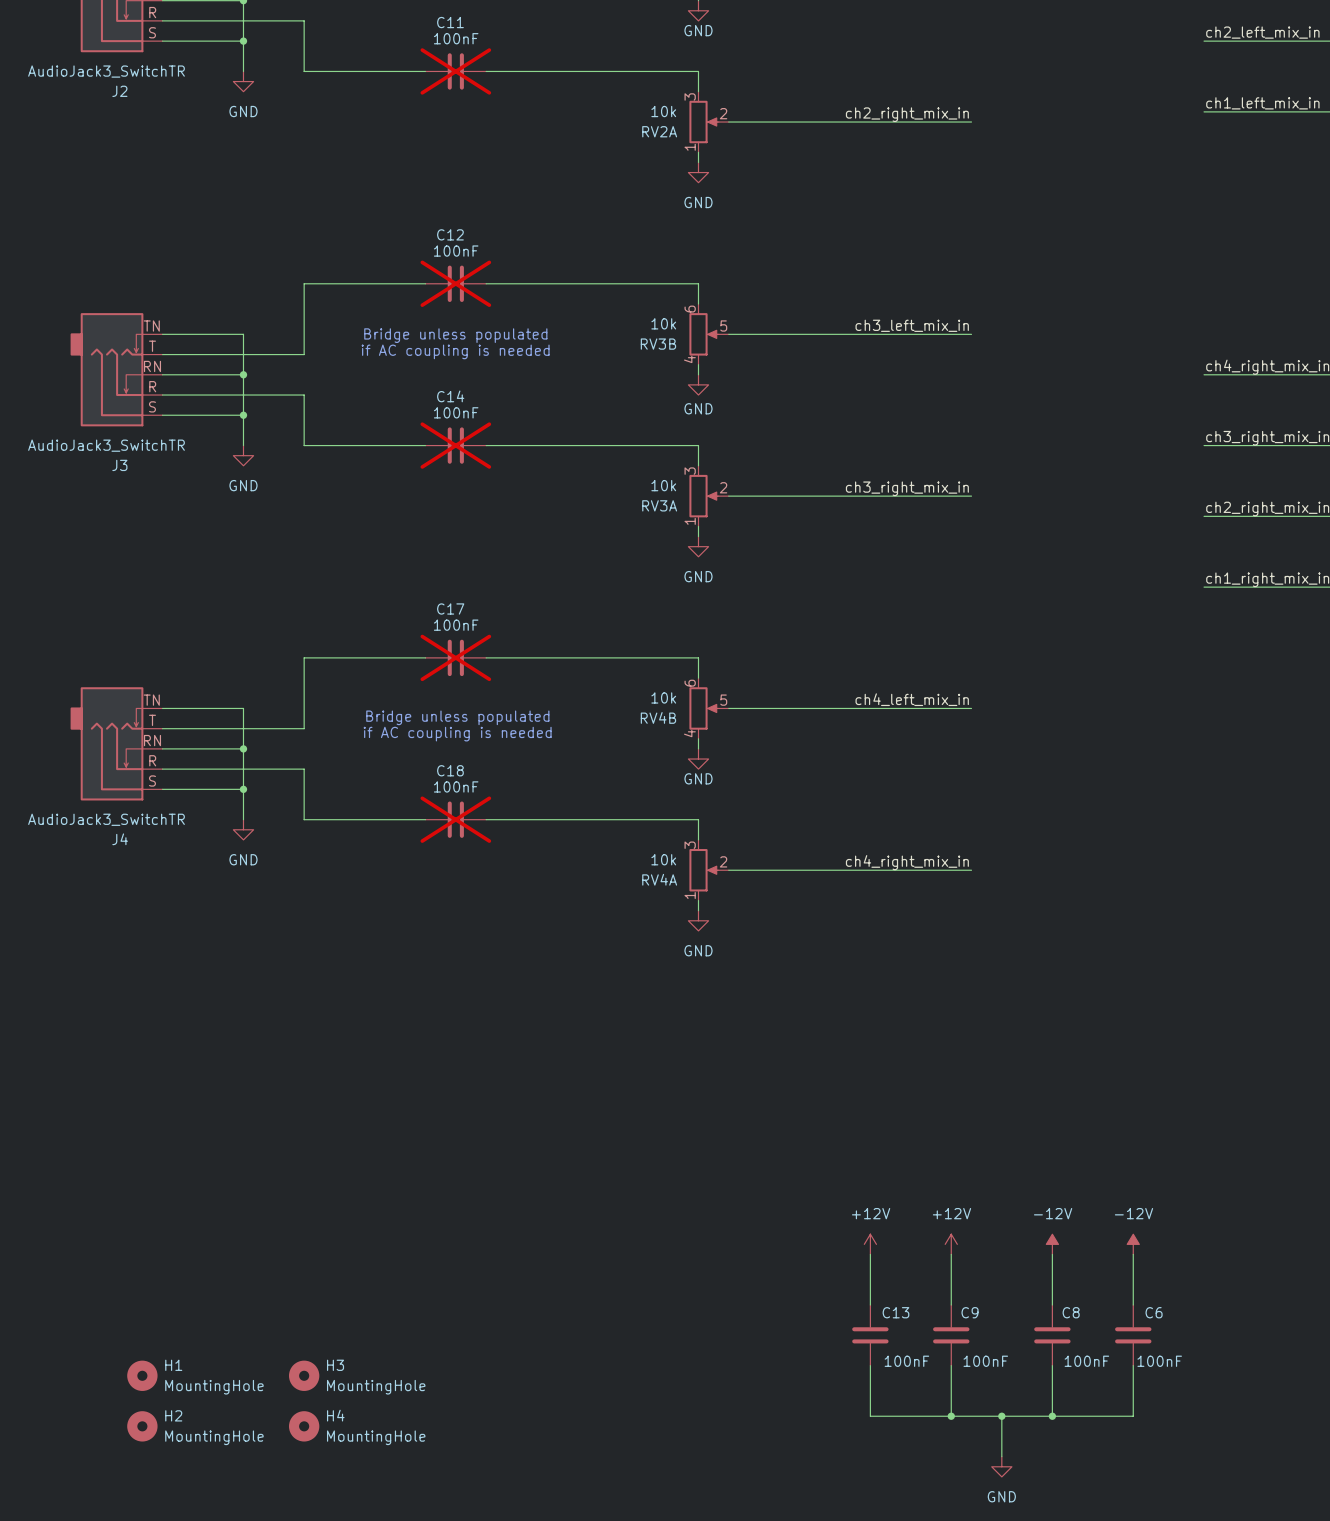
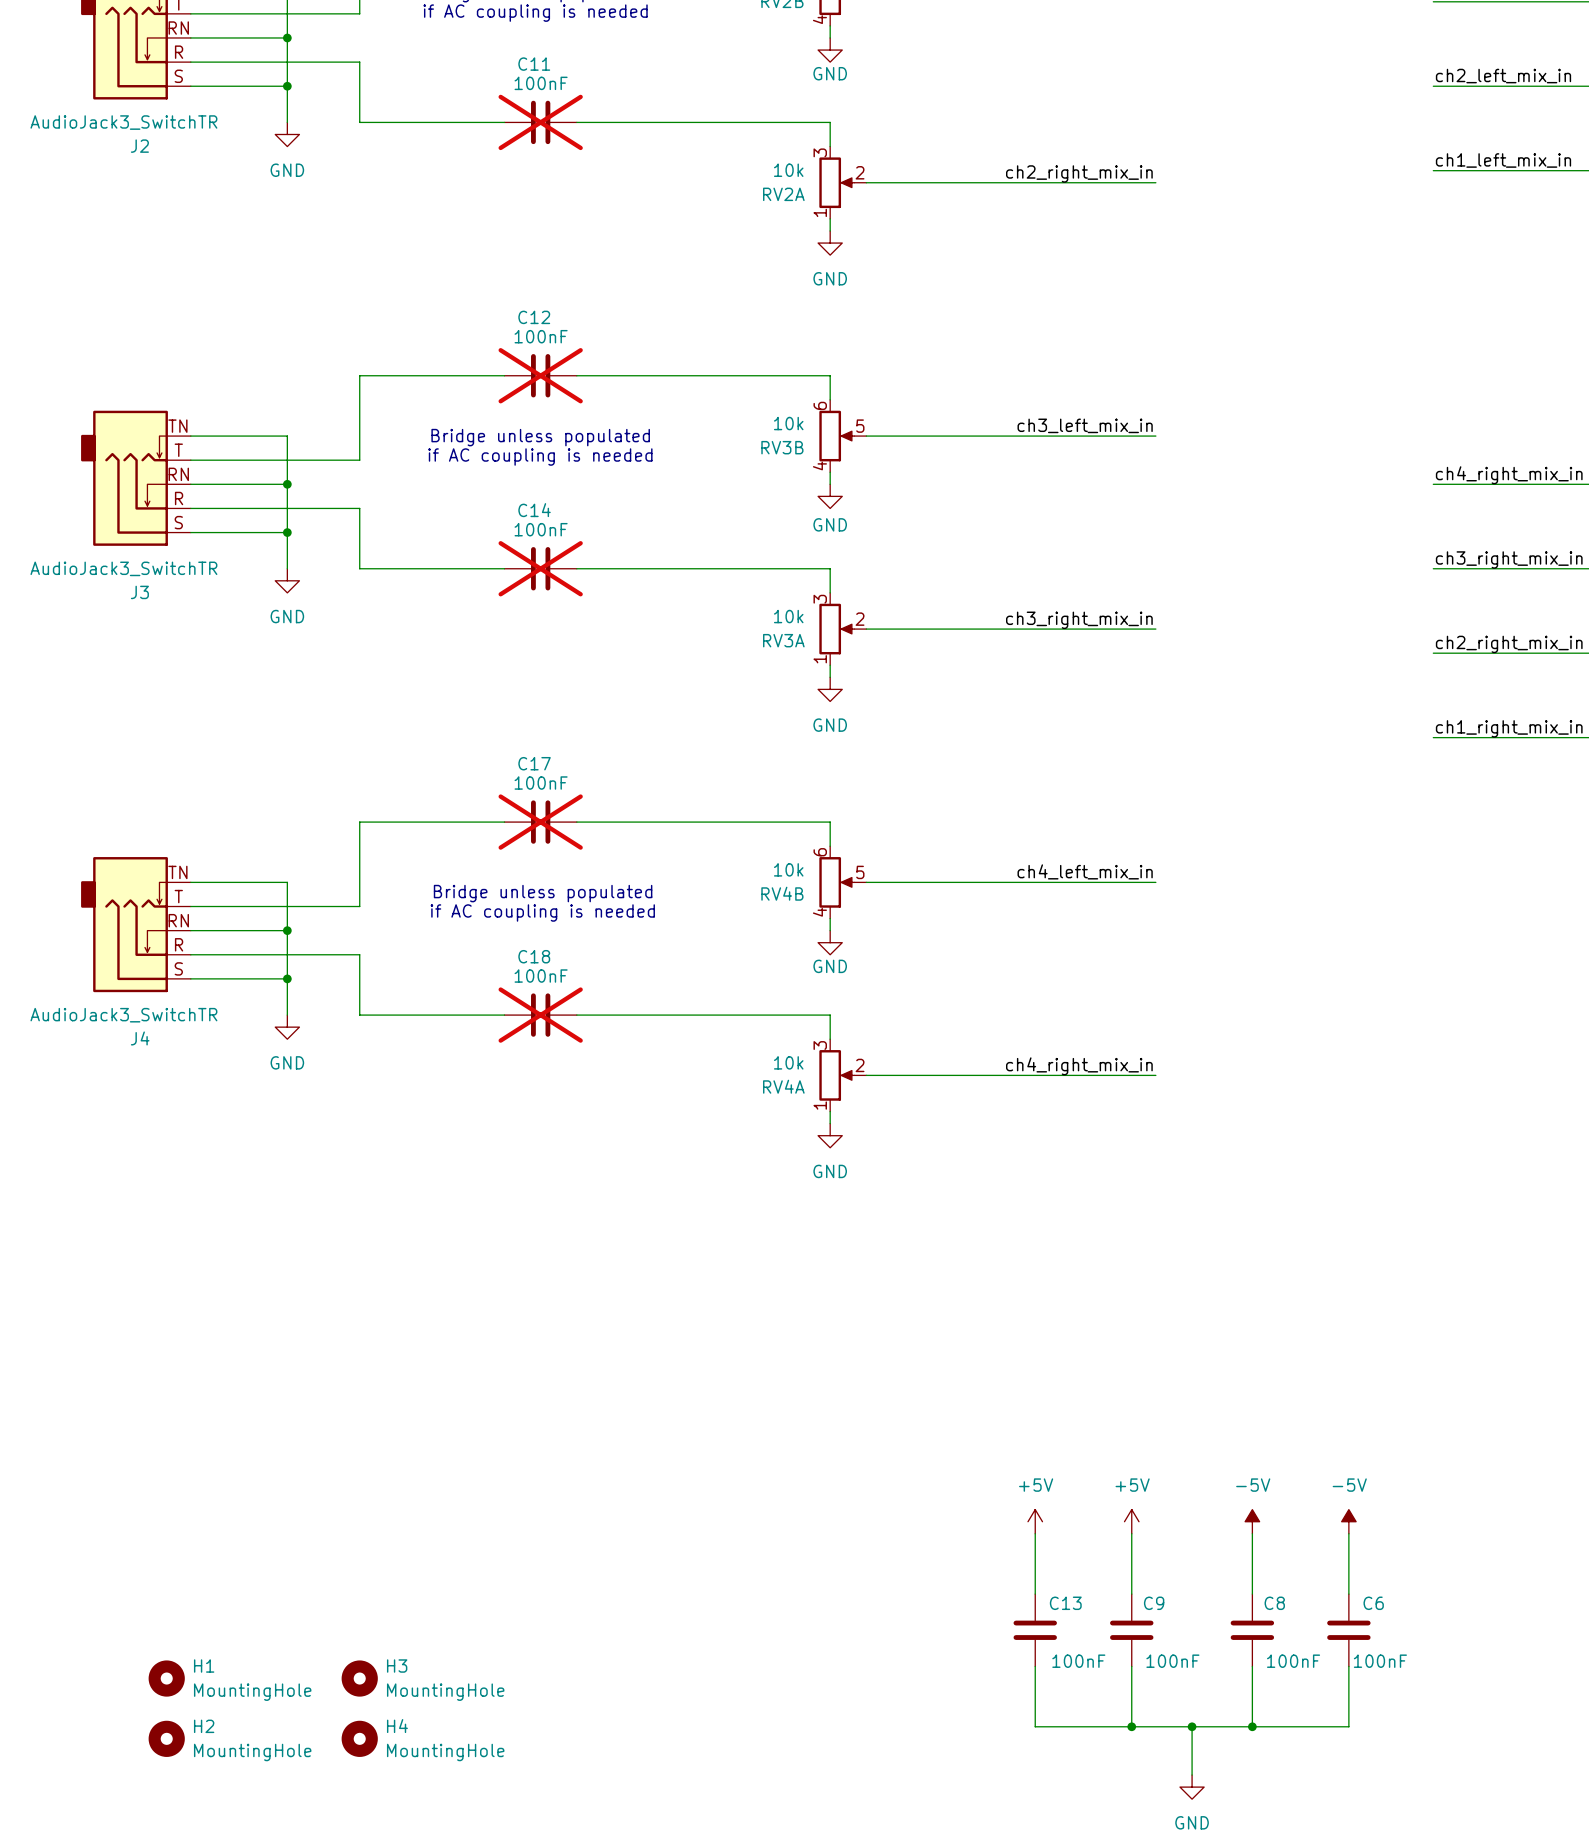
power symbol: +12V (870, 1244) -> +5V (1035, 1521)
power symbol: +12V (951, 1244) -> +5V (1131, 1521)
power symbol: -12V (1052, 1244) -> -5V (1252, 1521)
power symbol: -12V (1133, 1244) -> -5V (1348, 1521)

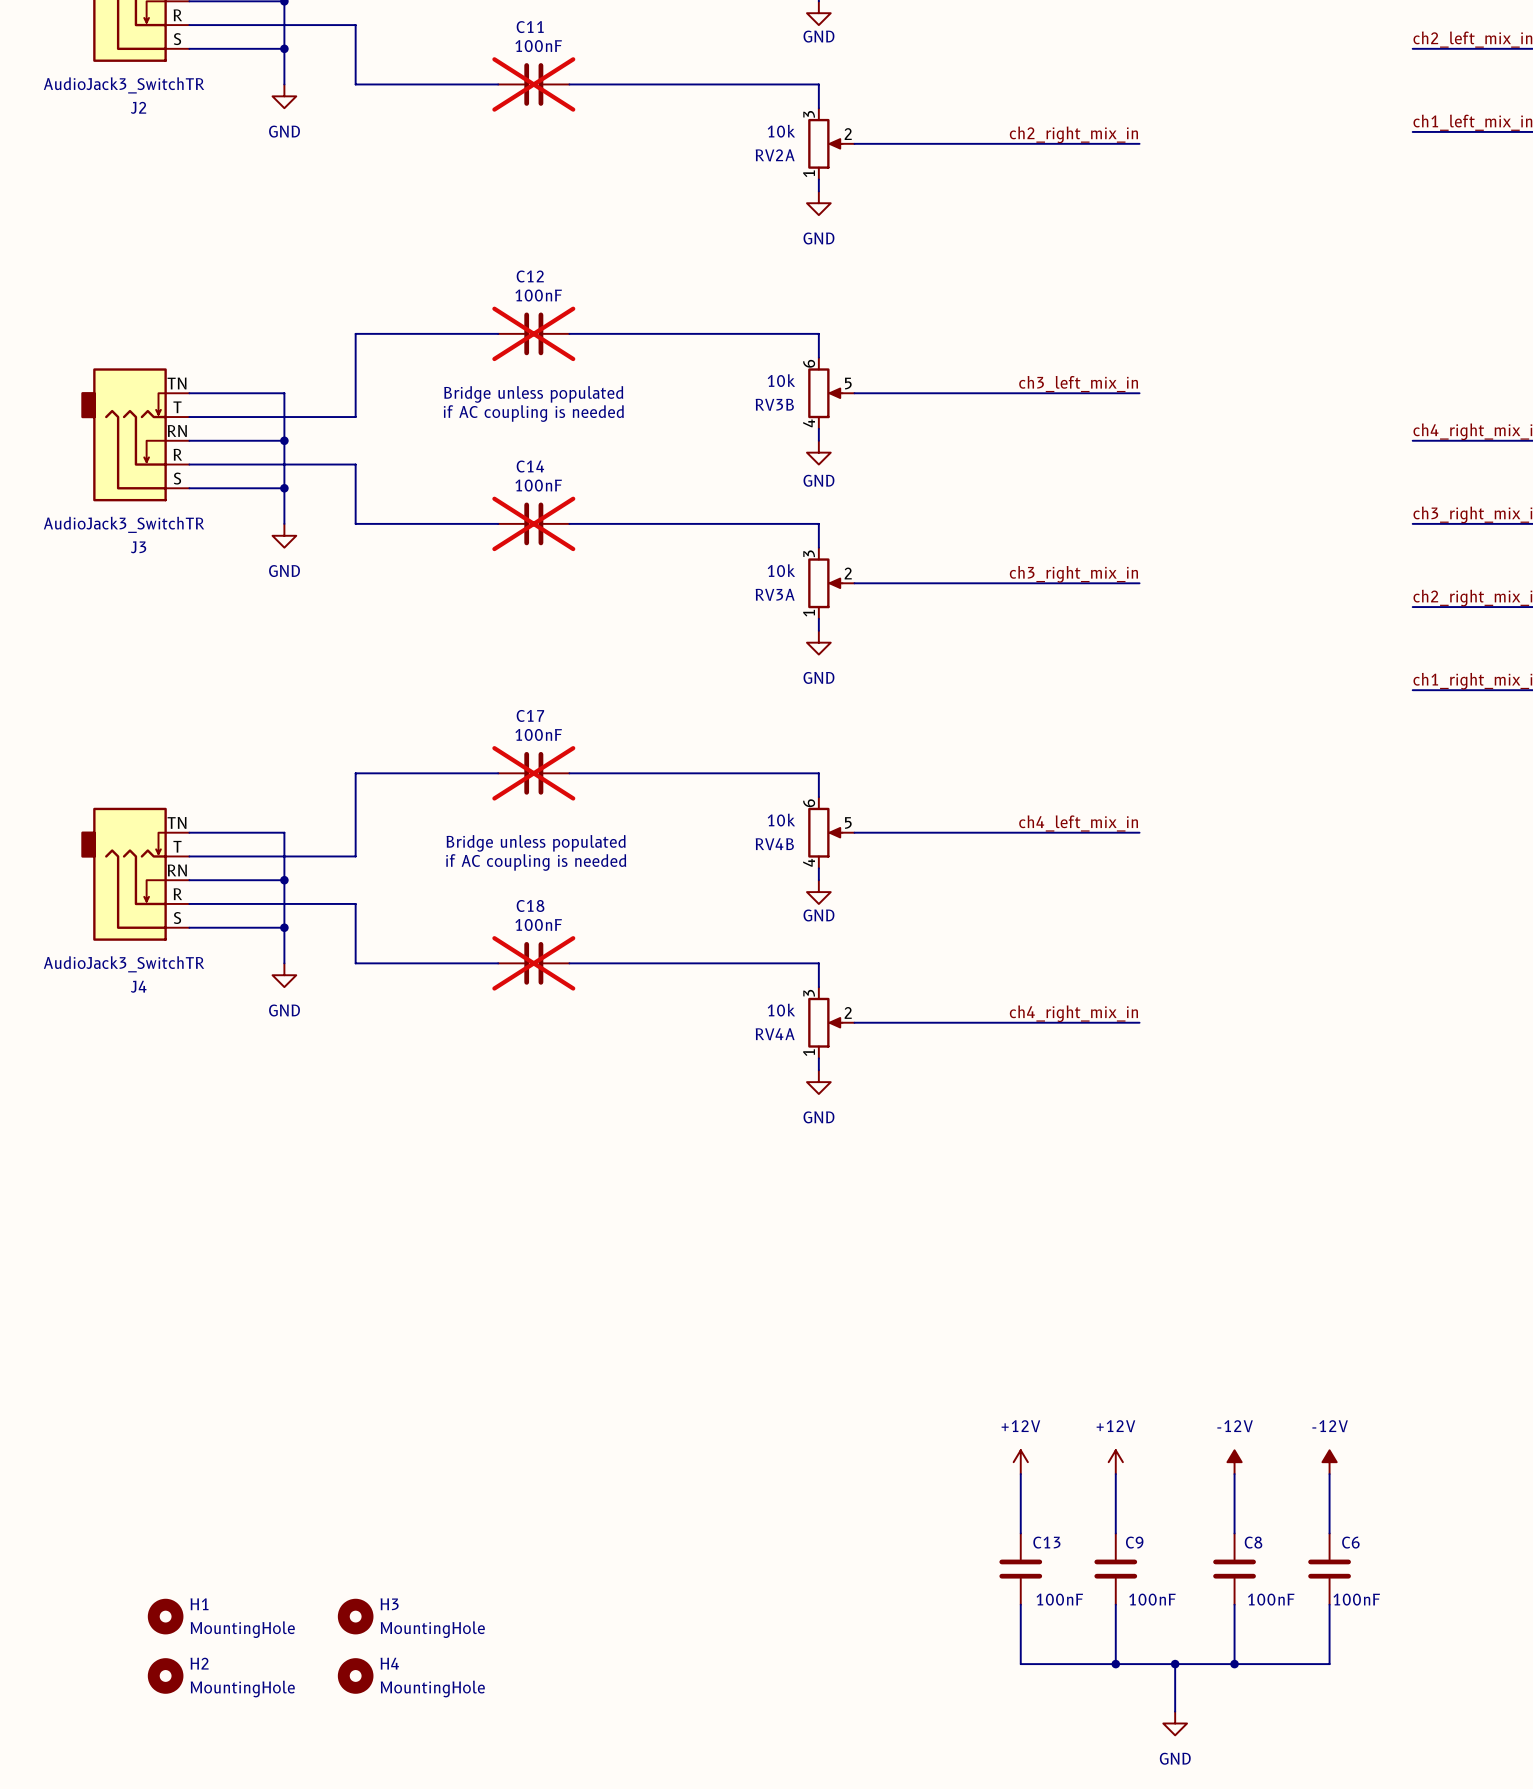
power symbol: +5V (1035, 1521) -> +12V (1020, 1462)
power symbol: +5V (1131, 1521) -> +12V (1115, 1462)
power symbol: -5V (1252, 1521) -> -12V (1234, 1462)
power symbol: -5V (1348, 1521) -> -12V (1329, 1462)

